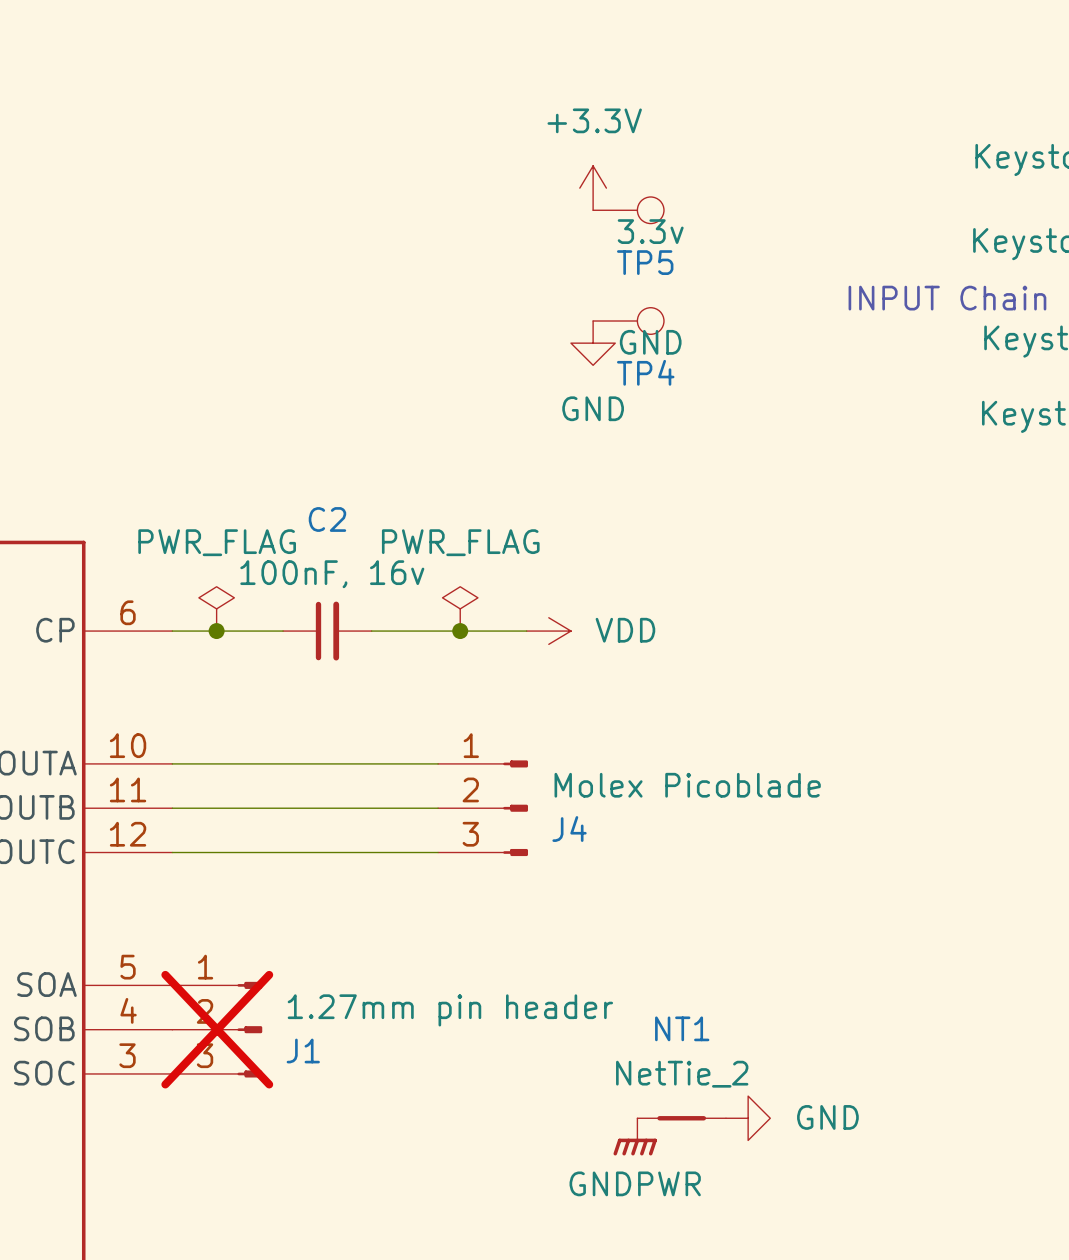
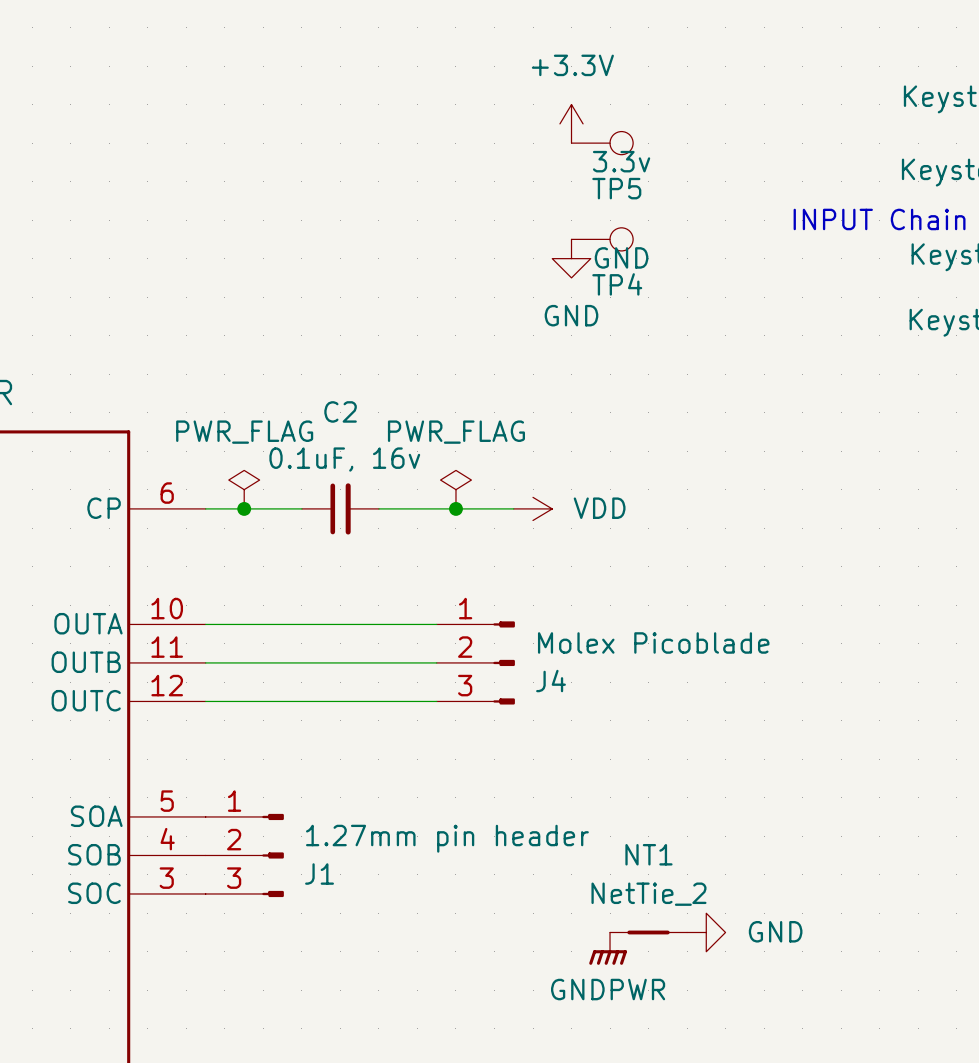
C2 value: 100nF, 16v (332, 574) -> 0.1uF, 16v (344, 459)
J1 do-not-place cross: (217, 1029) -> none

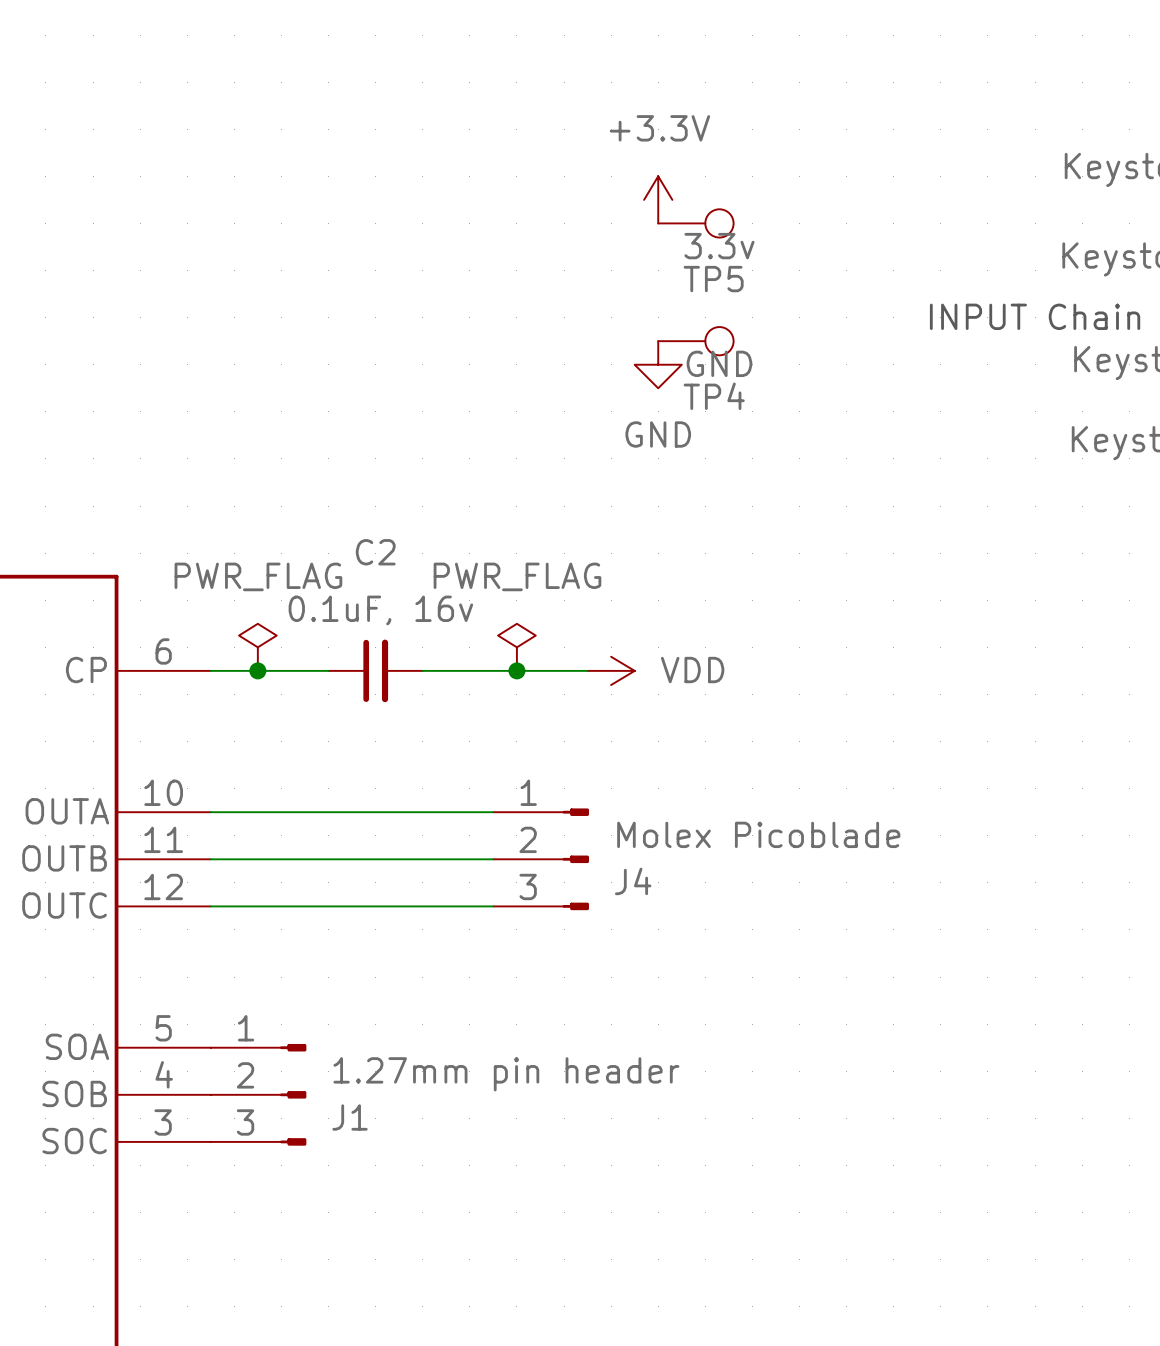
NT1: NetTie_2 (648, 932) -> none
power symbol: GND (706, 932) -> none
power symbol: GNDPWR (608, 948) -> none

